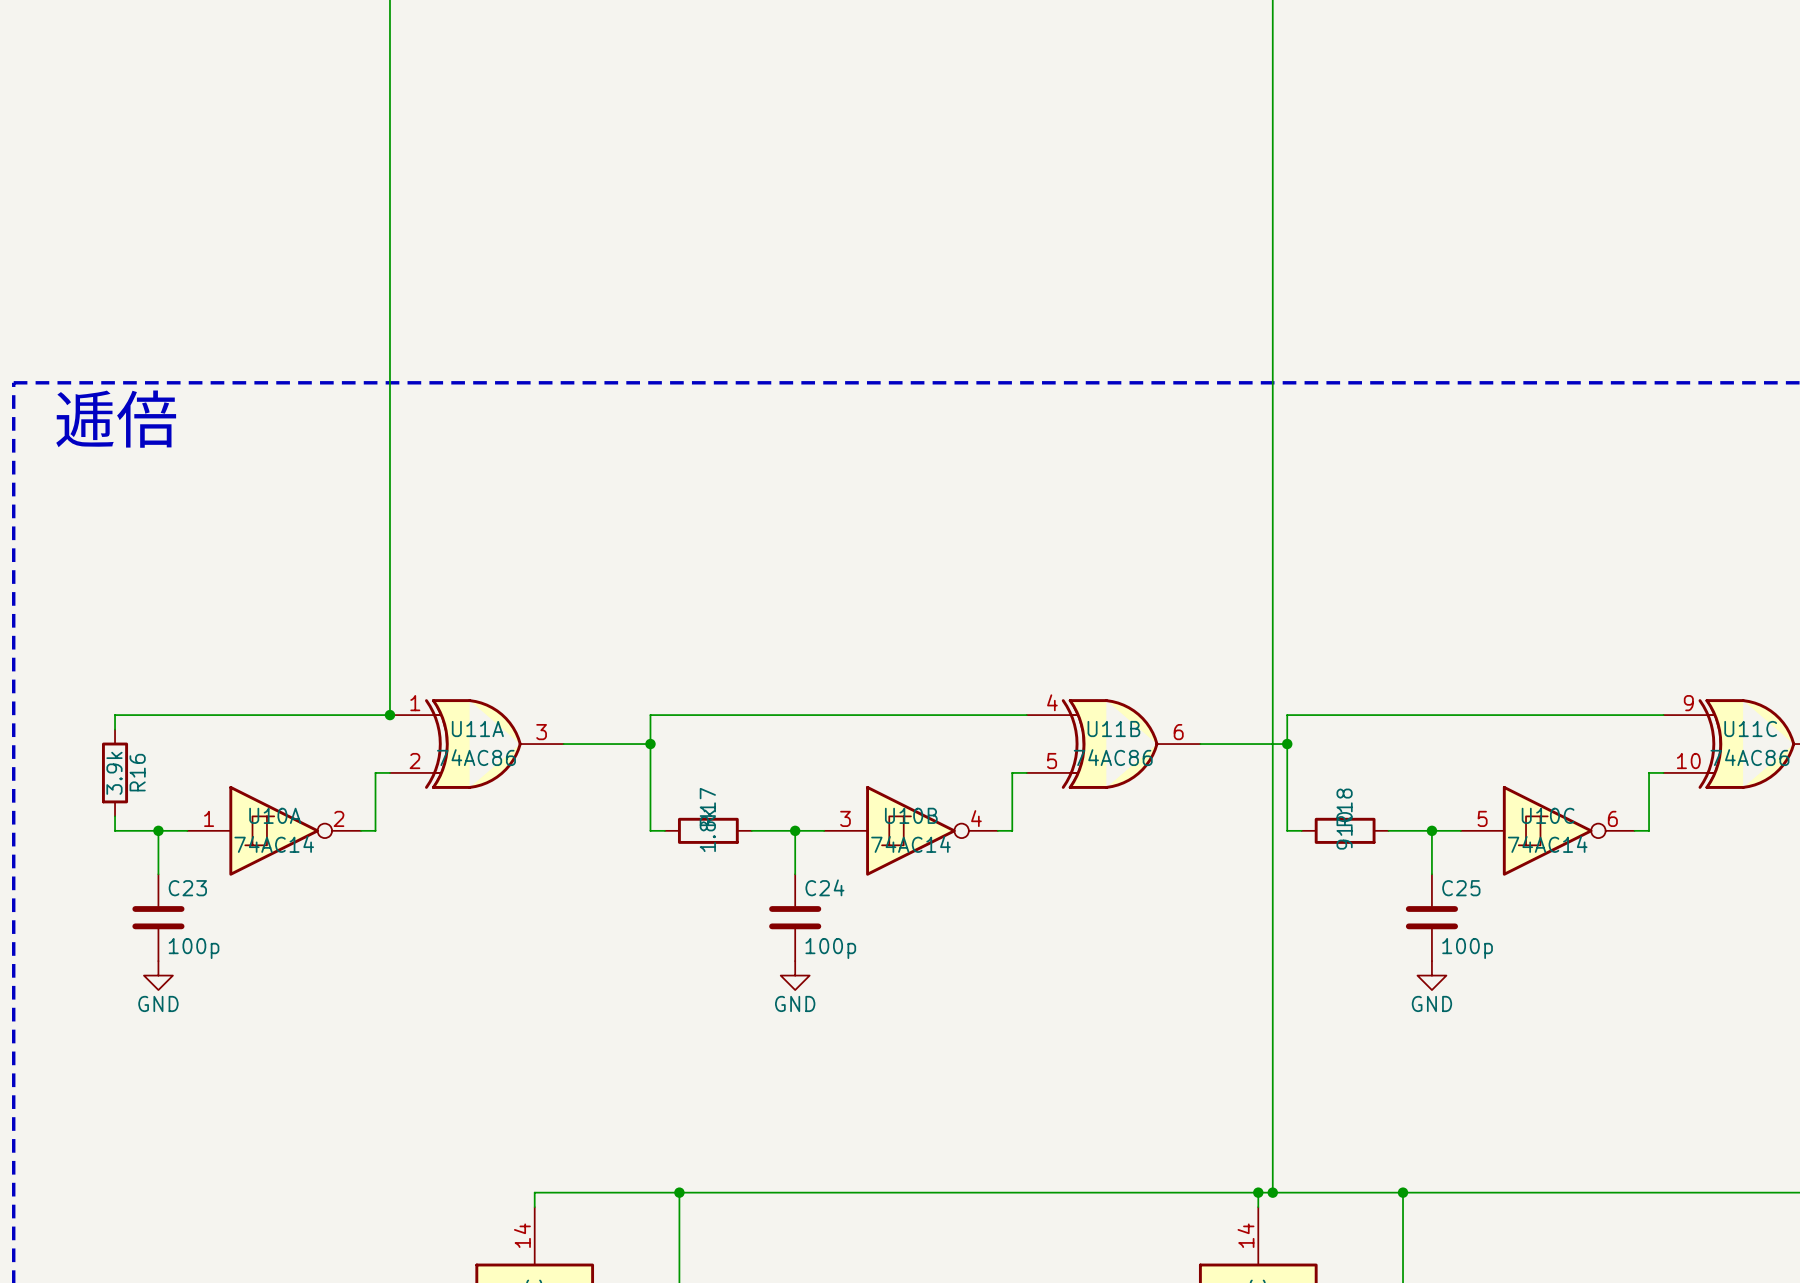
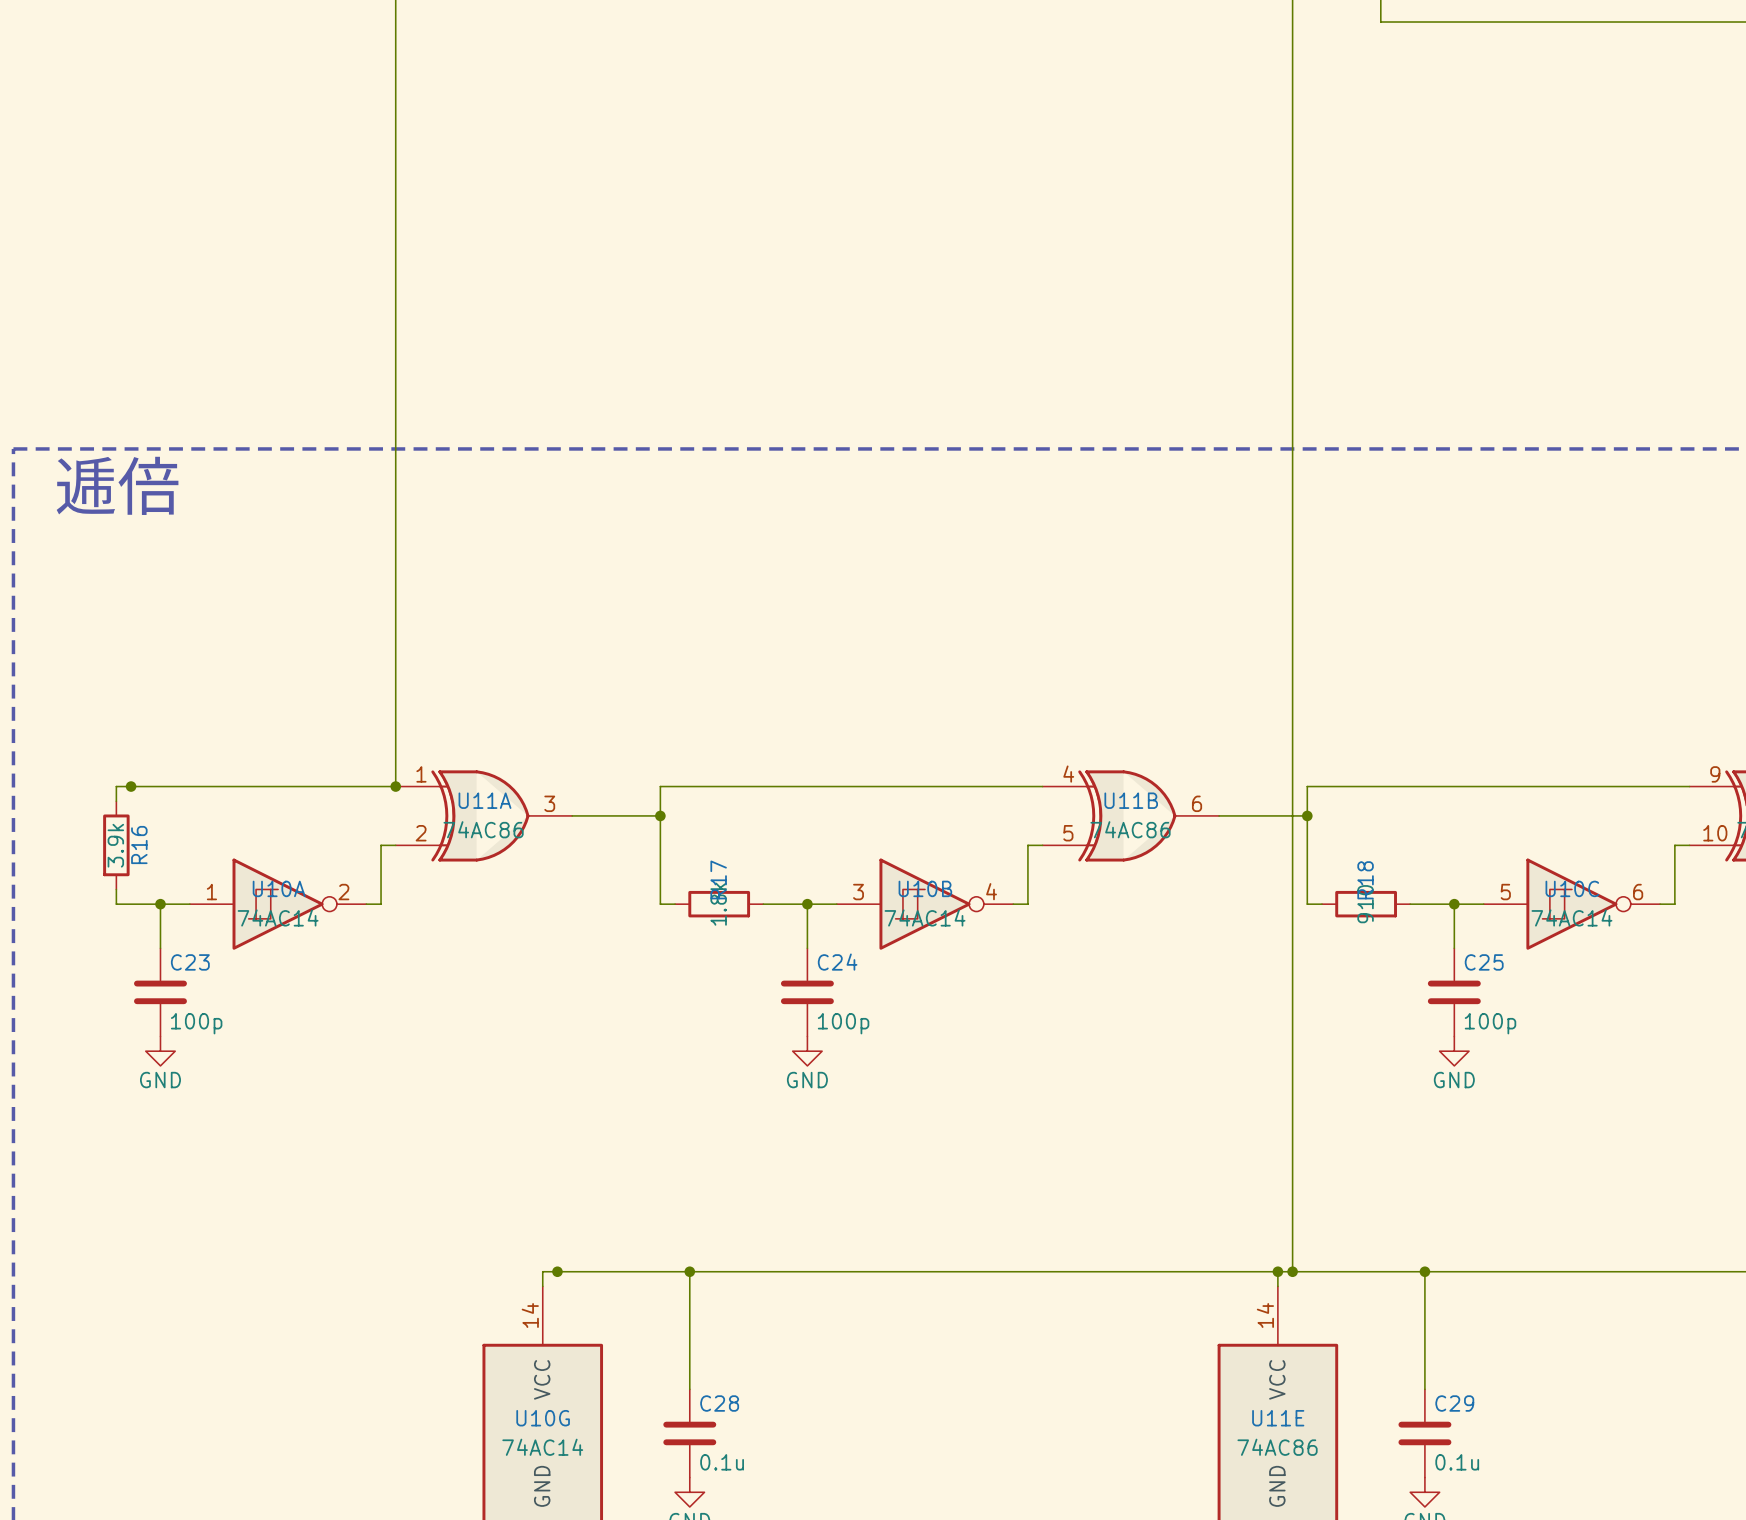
junction: none -> (131, 786)
junction: none -> (557, 1271)

